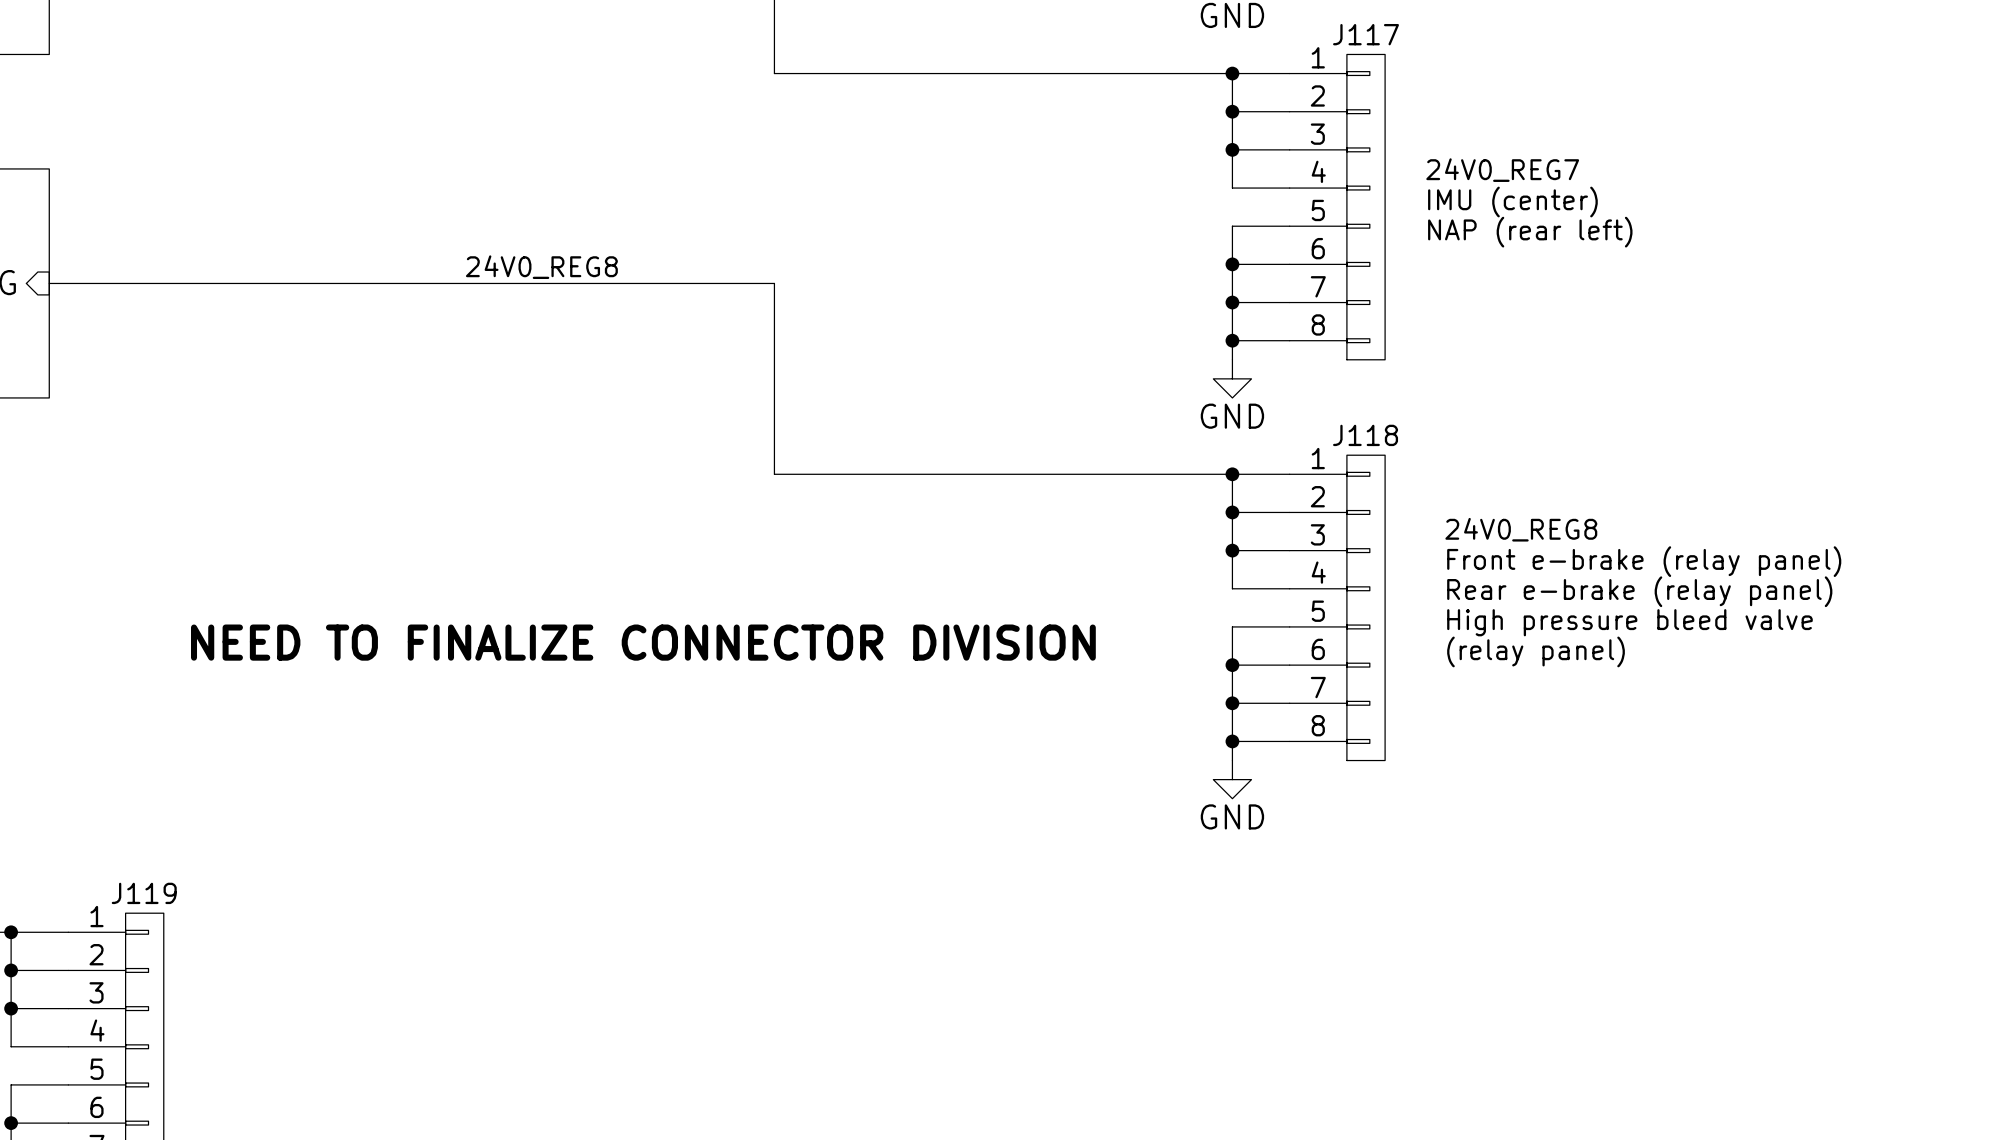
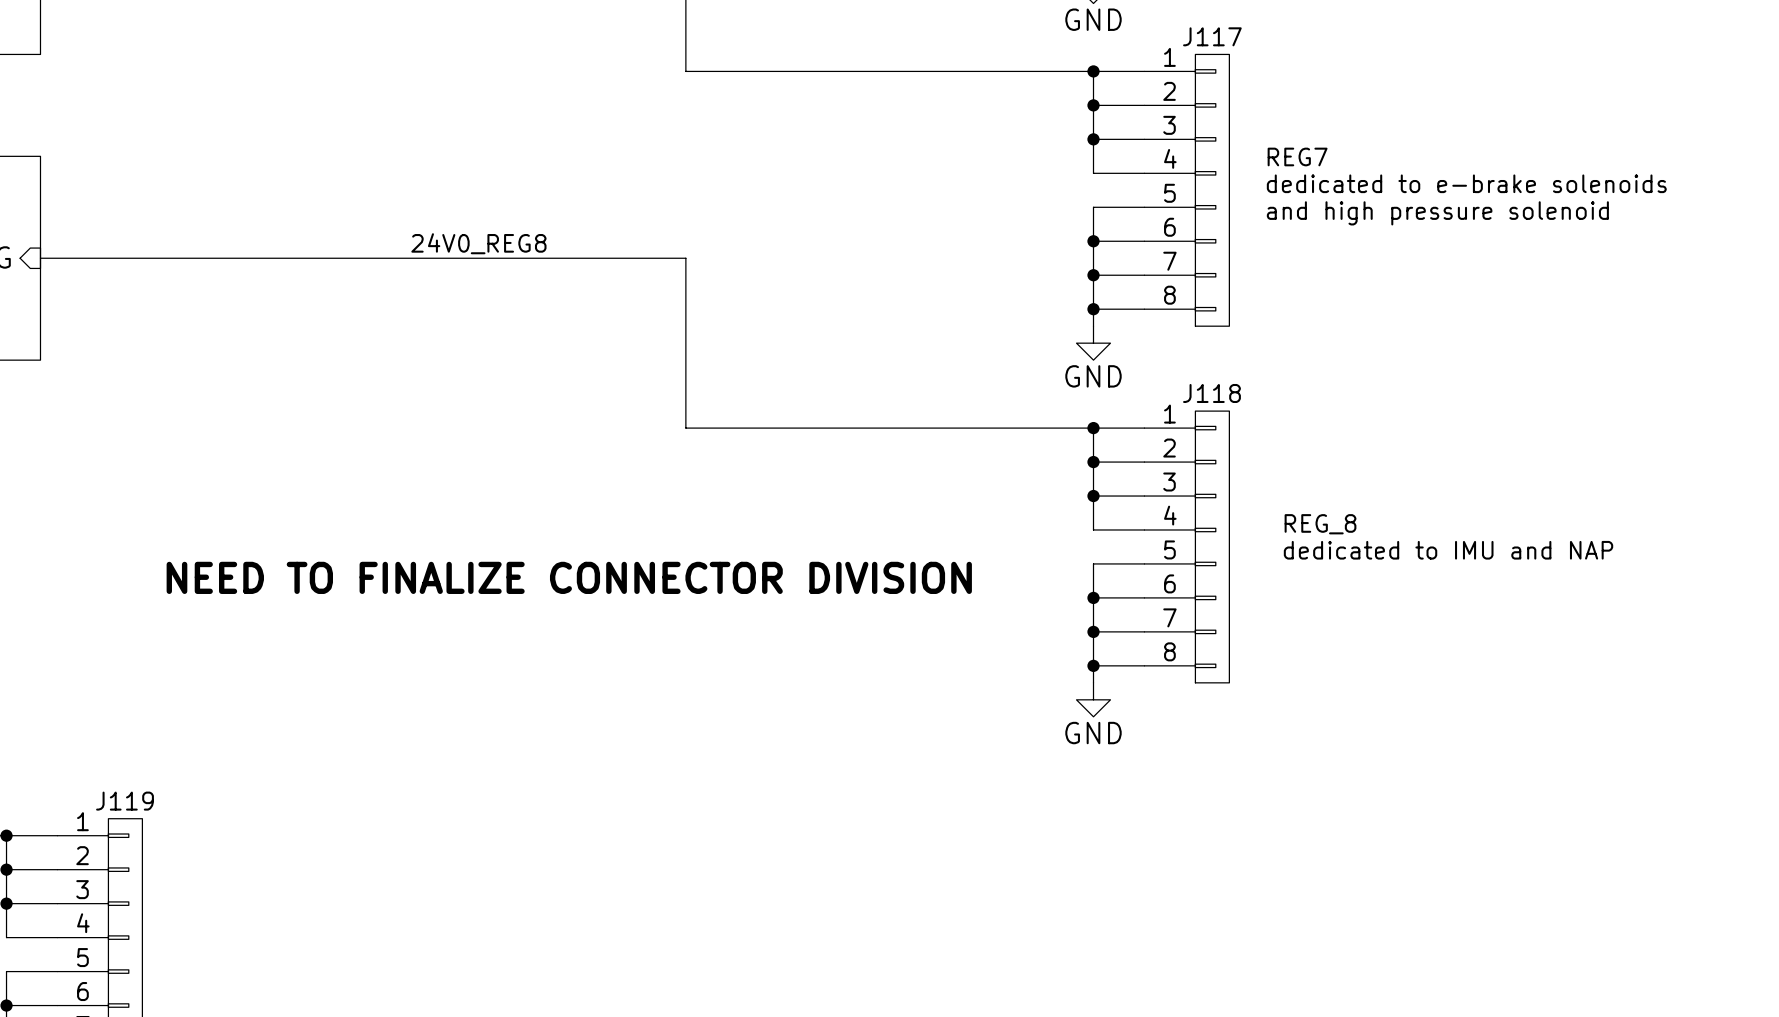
text: 24V0_REG7 (1502, 170) -> REG7 (1297, 156)
text: IMU (center) (1512, 202) -> dedicated to e-brake solenoids (1466, 183)
text: NAP (rear left) (1530, 232) -> and high pressure solenoid (1437, 213)
text: 24V0_REG8 (1521, 529) -> none
text: Front e-brake (relay panel) (1644, 561) -> none
text: Rear e-brake (relay panel) (1639, 591) -> REG_8 (1320, 524)
text: High pressure bleed valve (1629, 622) -> dedicated to IMU and NAP (1448, 550)
text: (relay panel) (1536, 651) -> none

